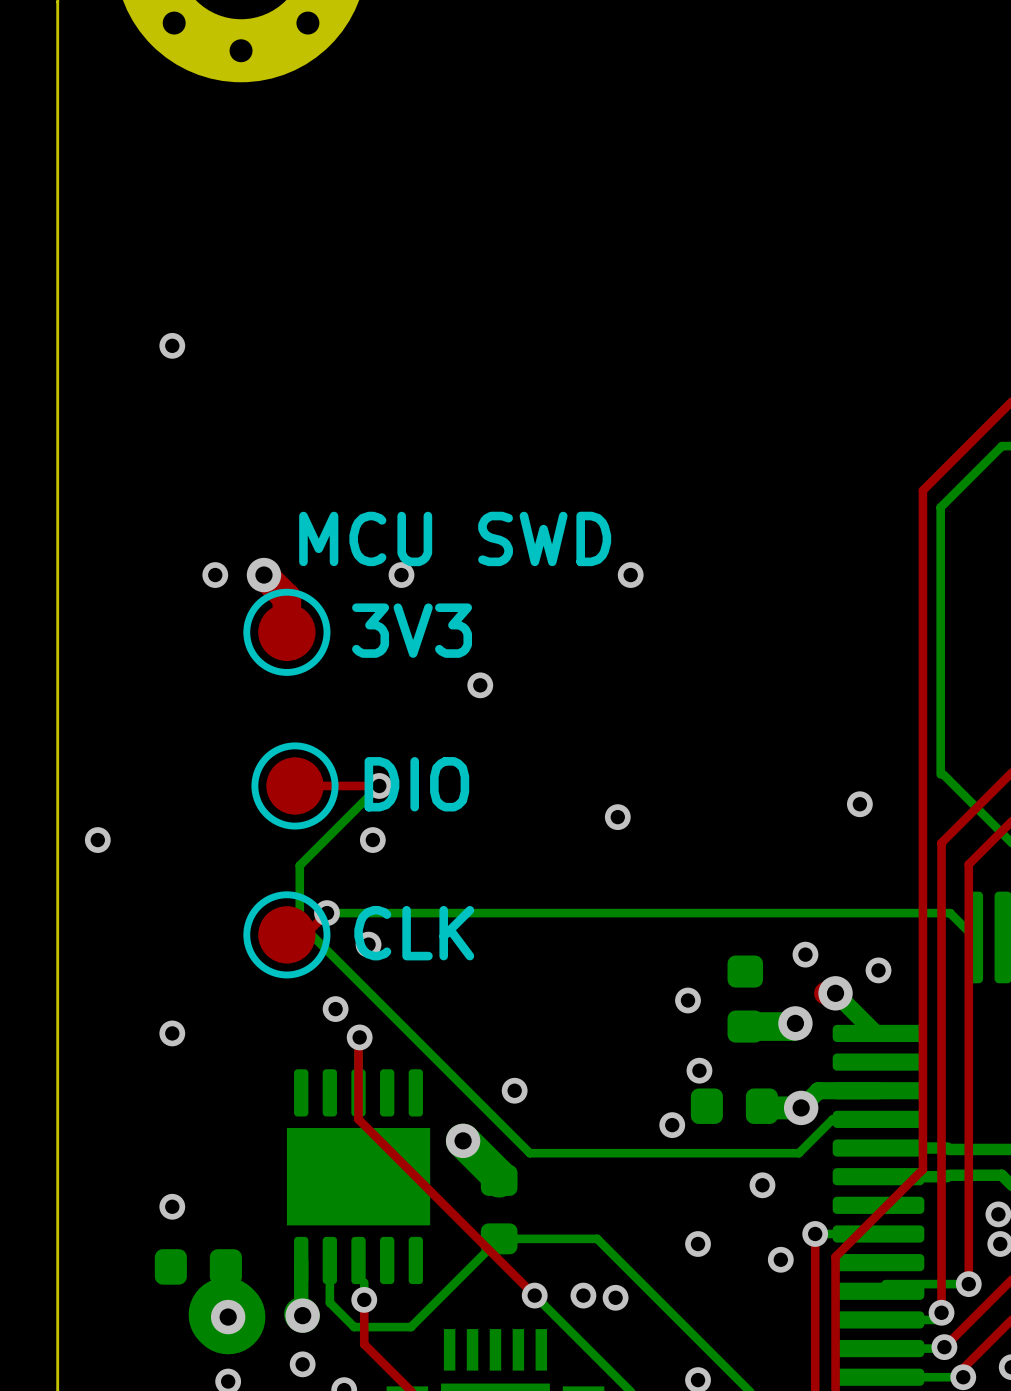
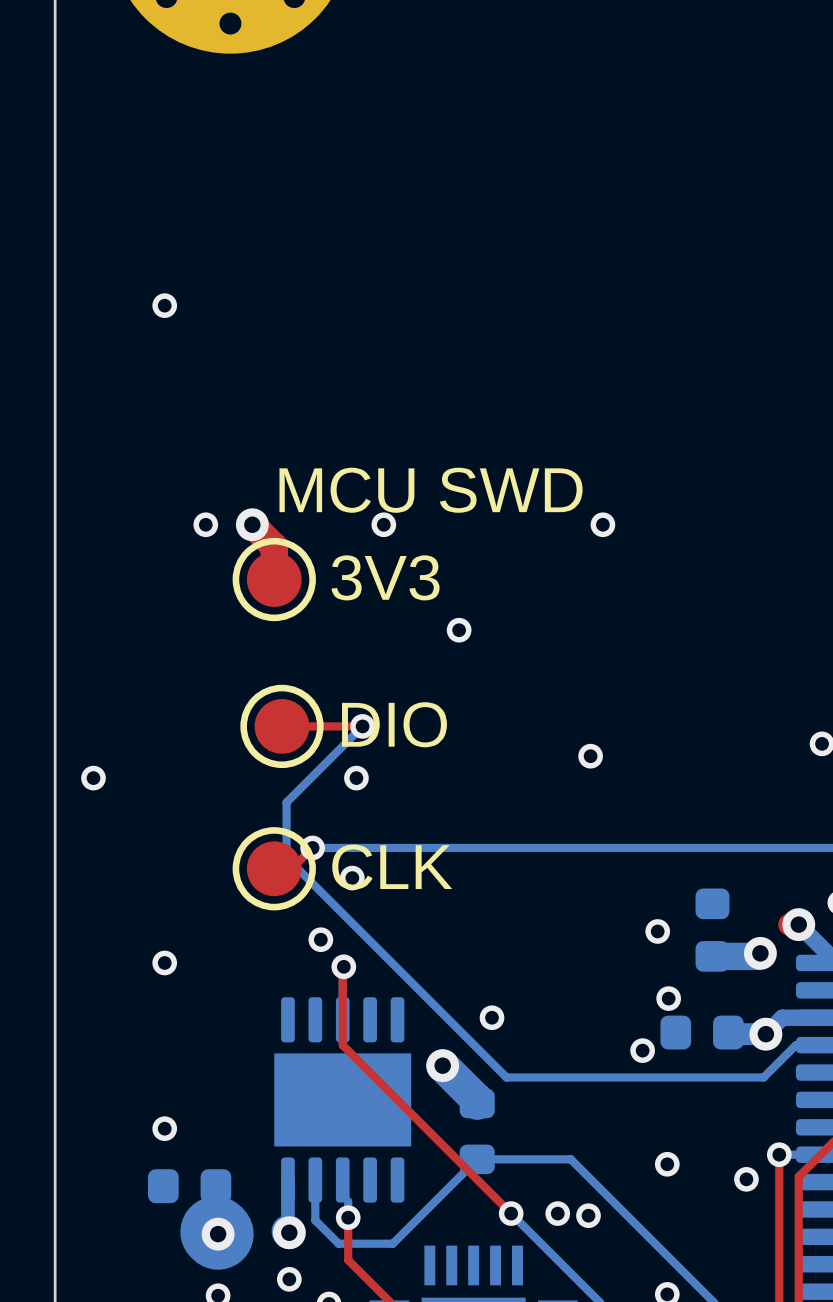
via: (805, 954) -> none
via: (762, 1185) -> none

